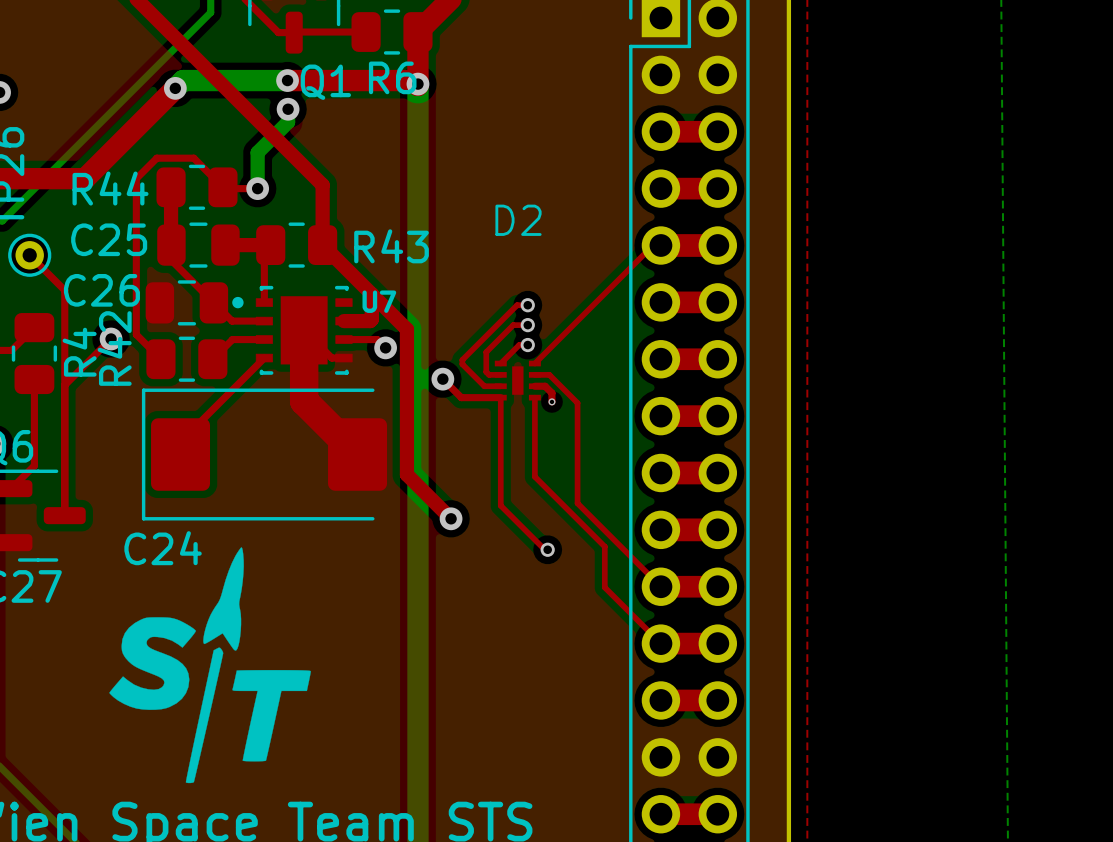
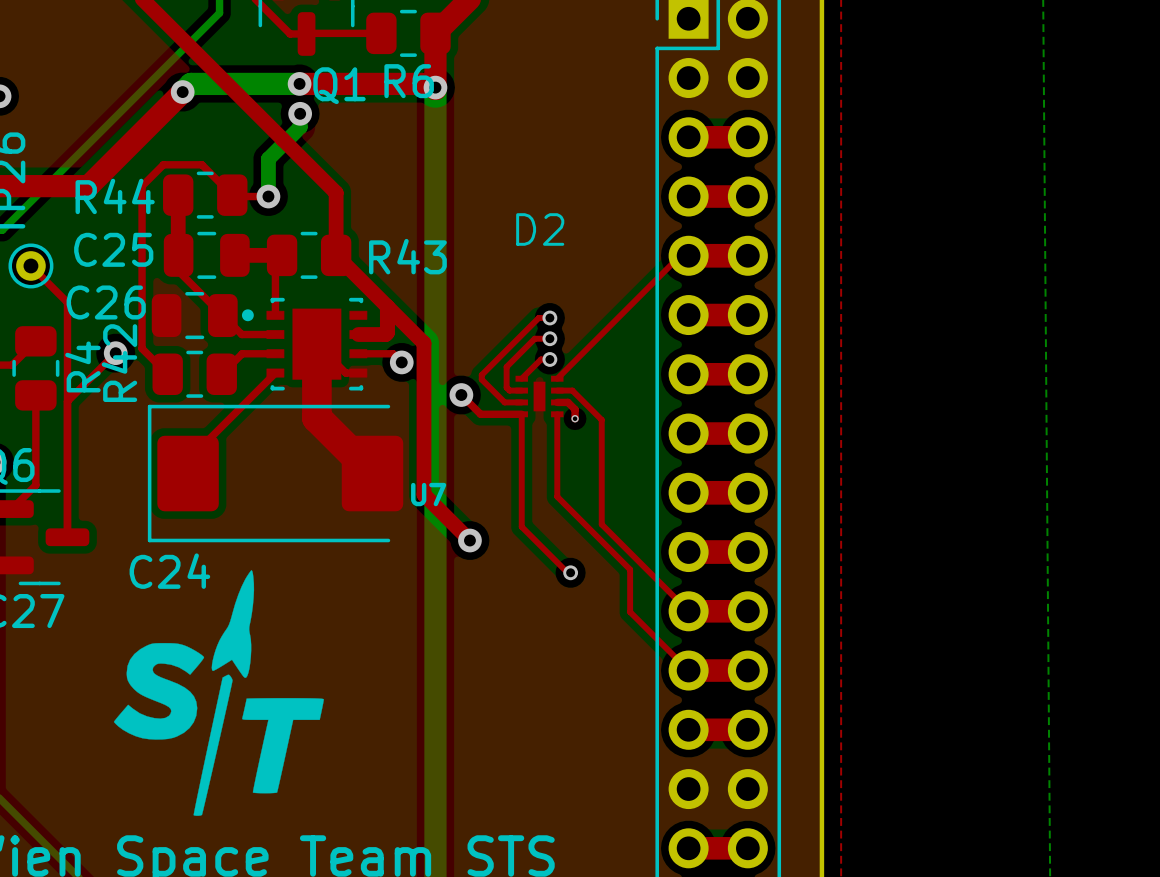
U7 name position: U7 (379, 301) -> U7 (428, 494)

